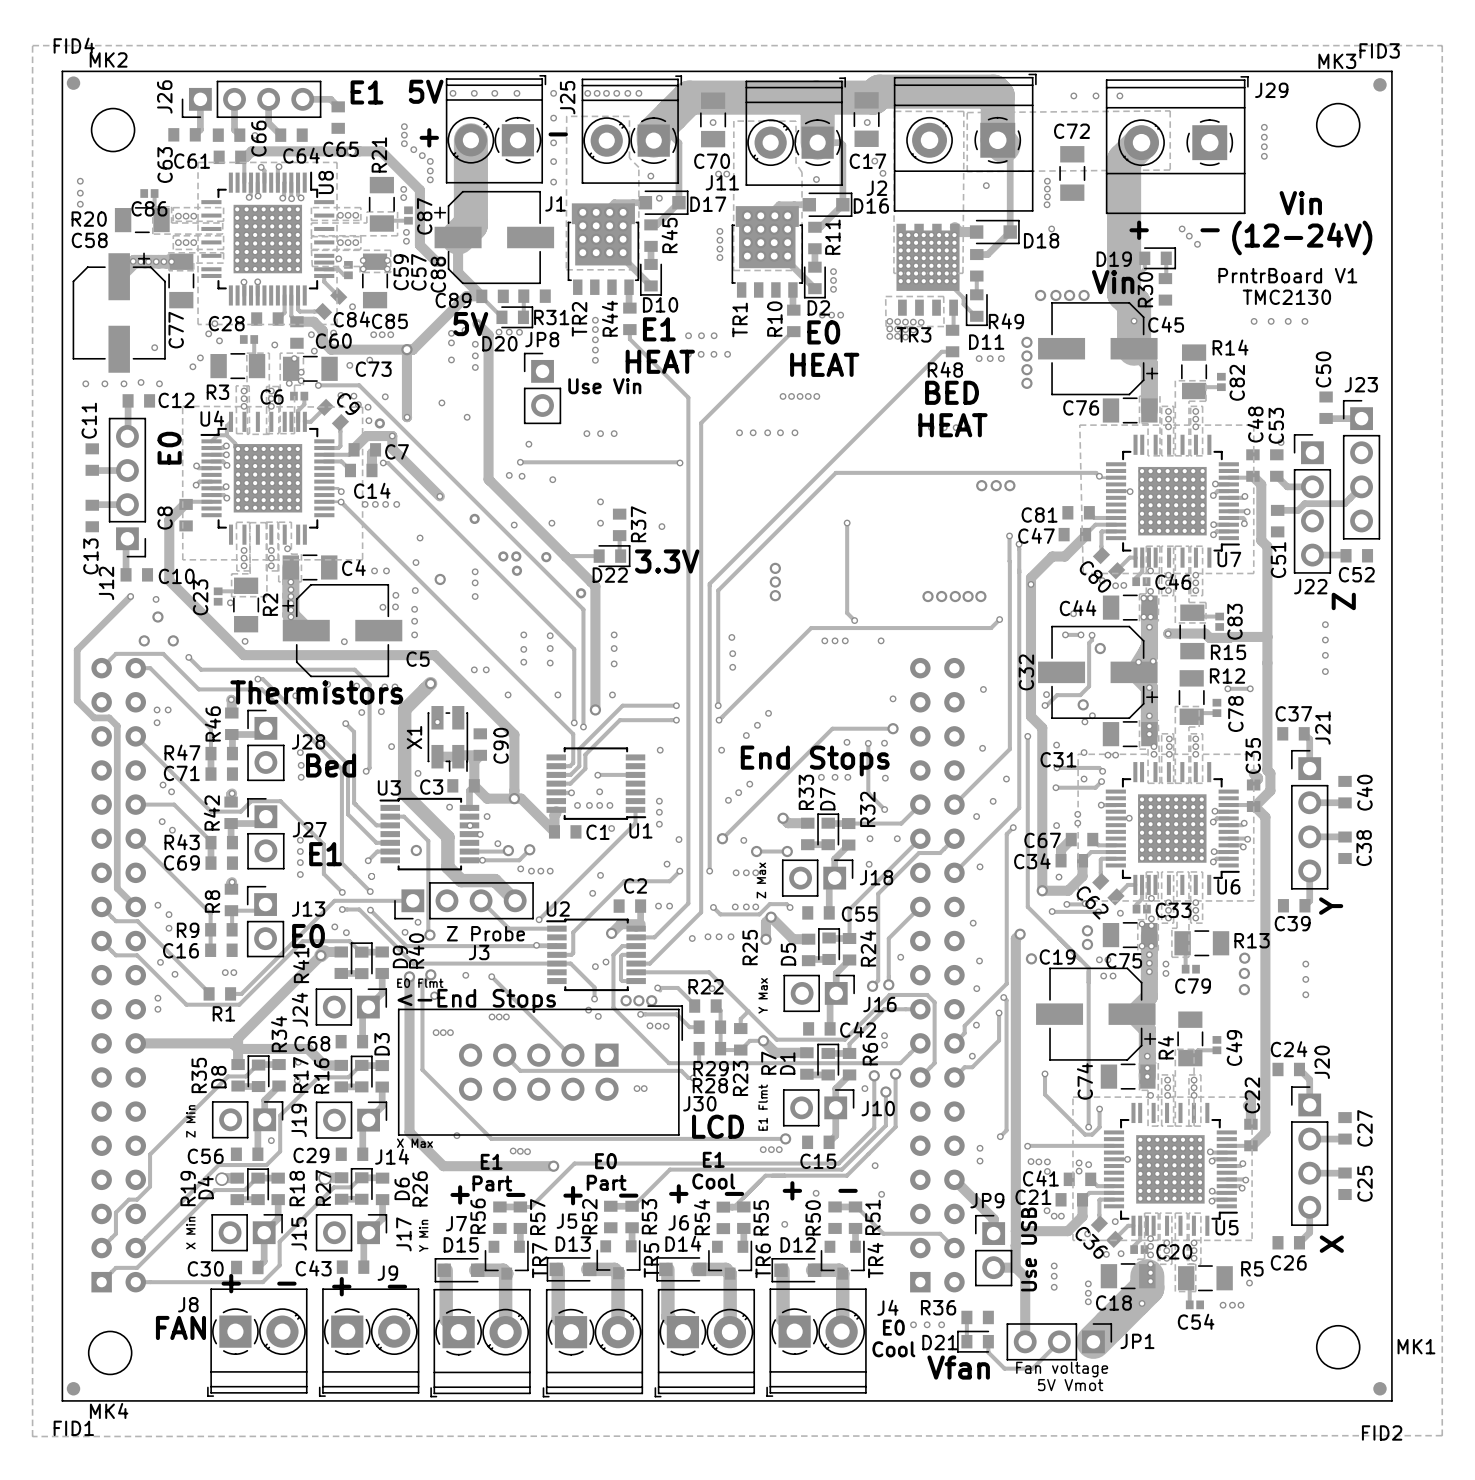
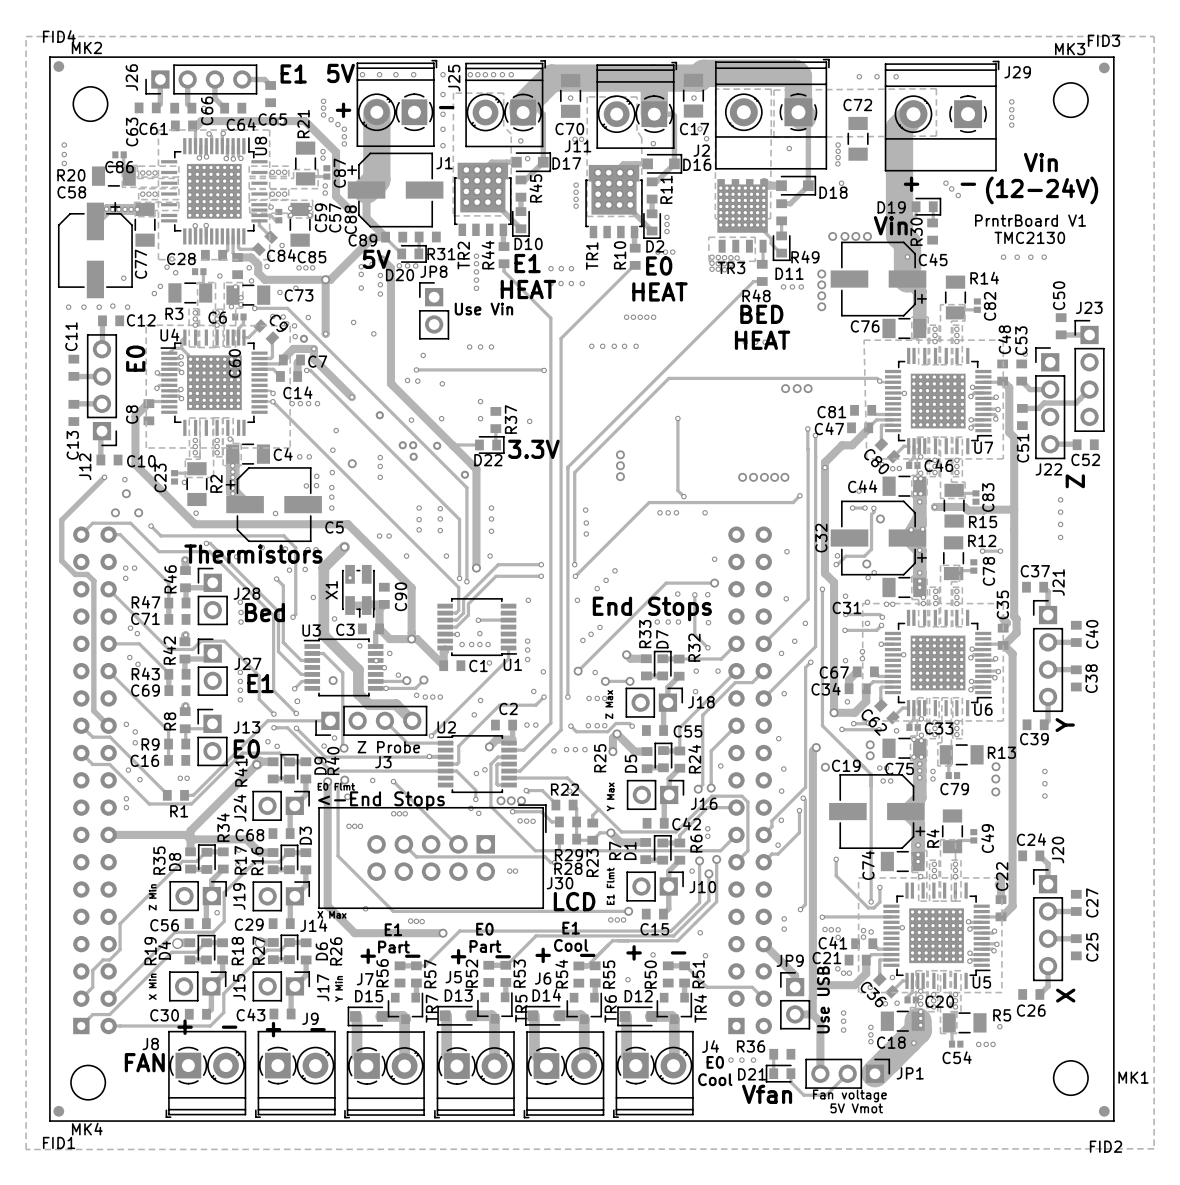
C60 name rotation: 0° (333, 341) -> 90° counterclockwise (234, 363)
C60 name position: C60 (333, 341) -> C60 (234, 363)

